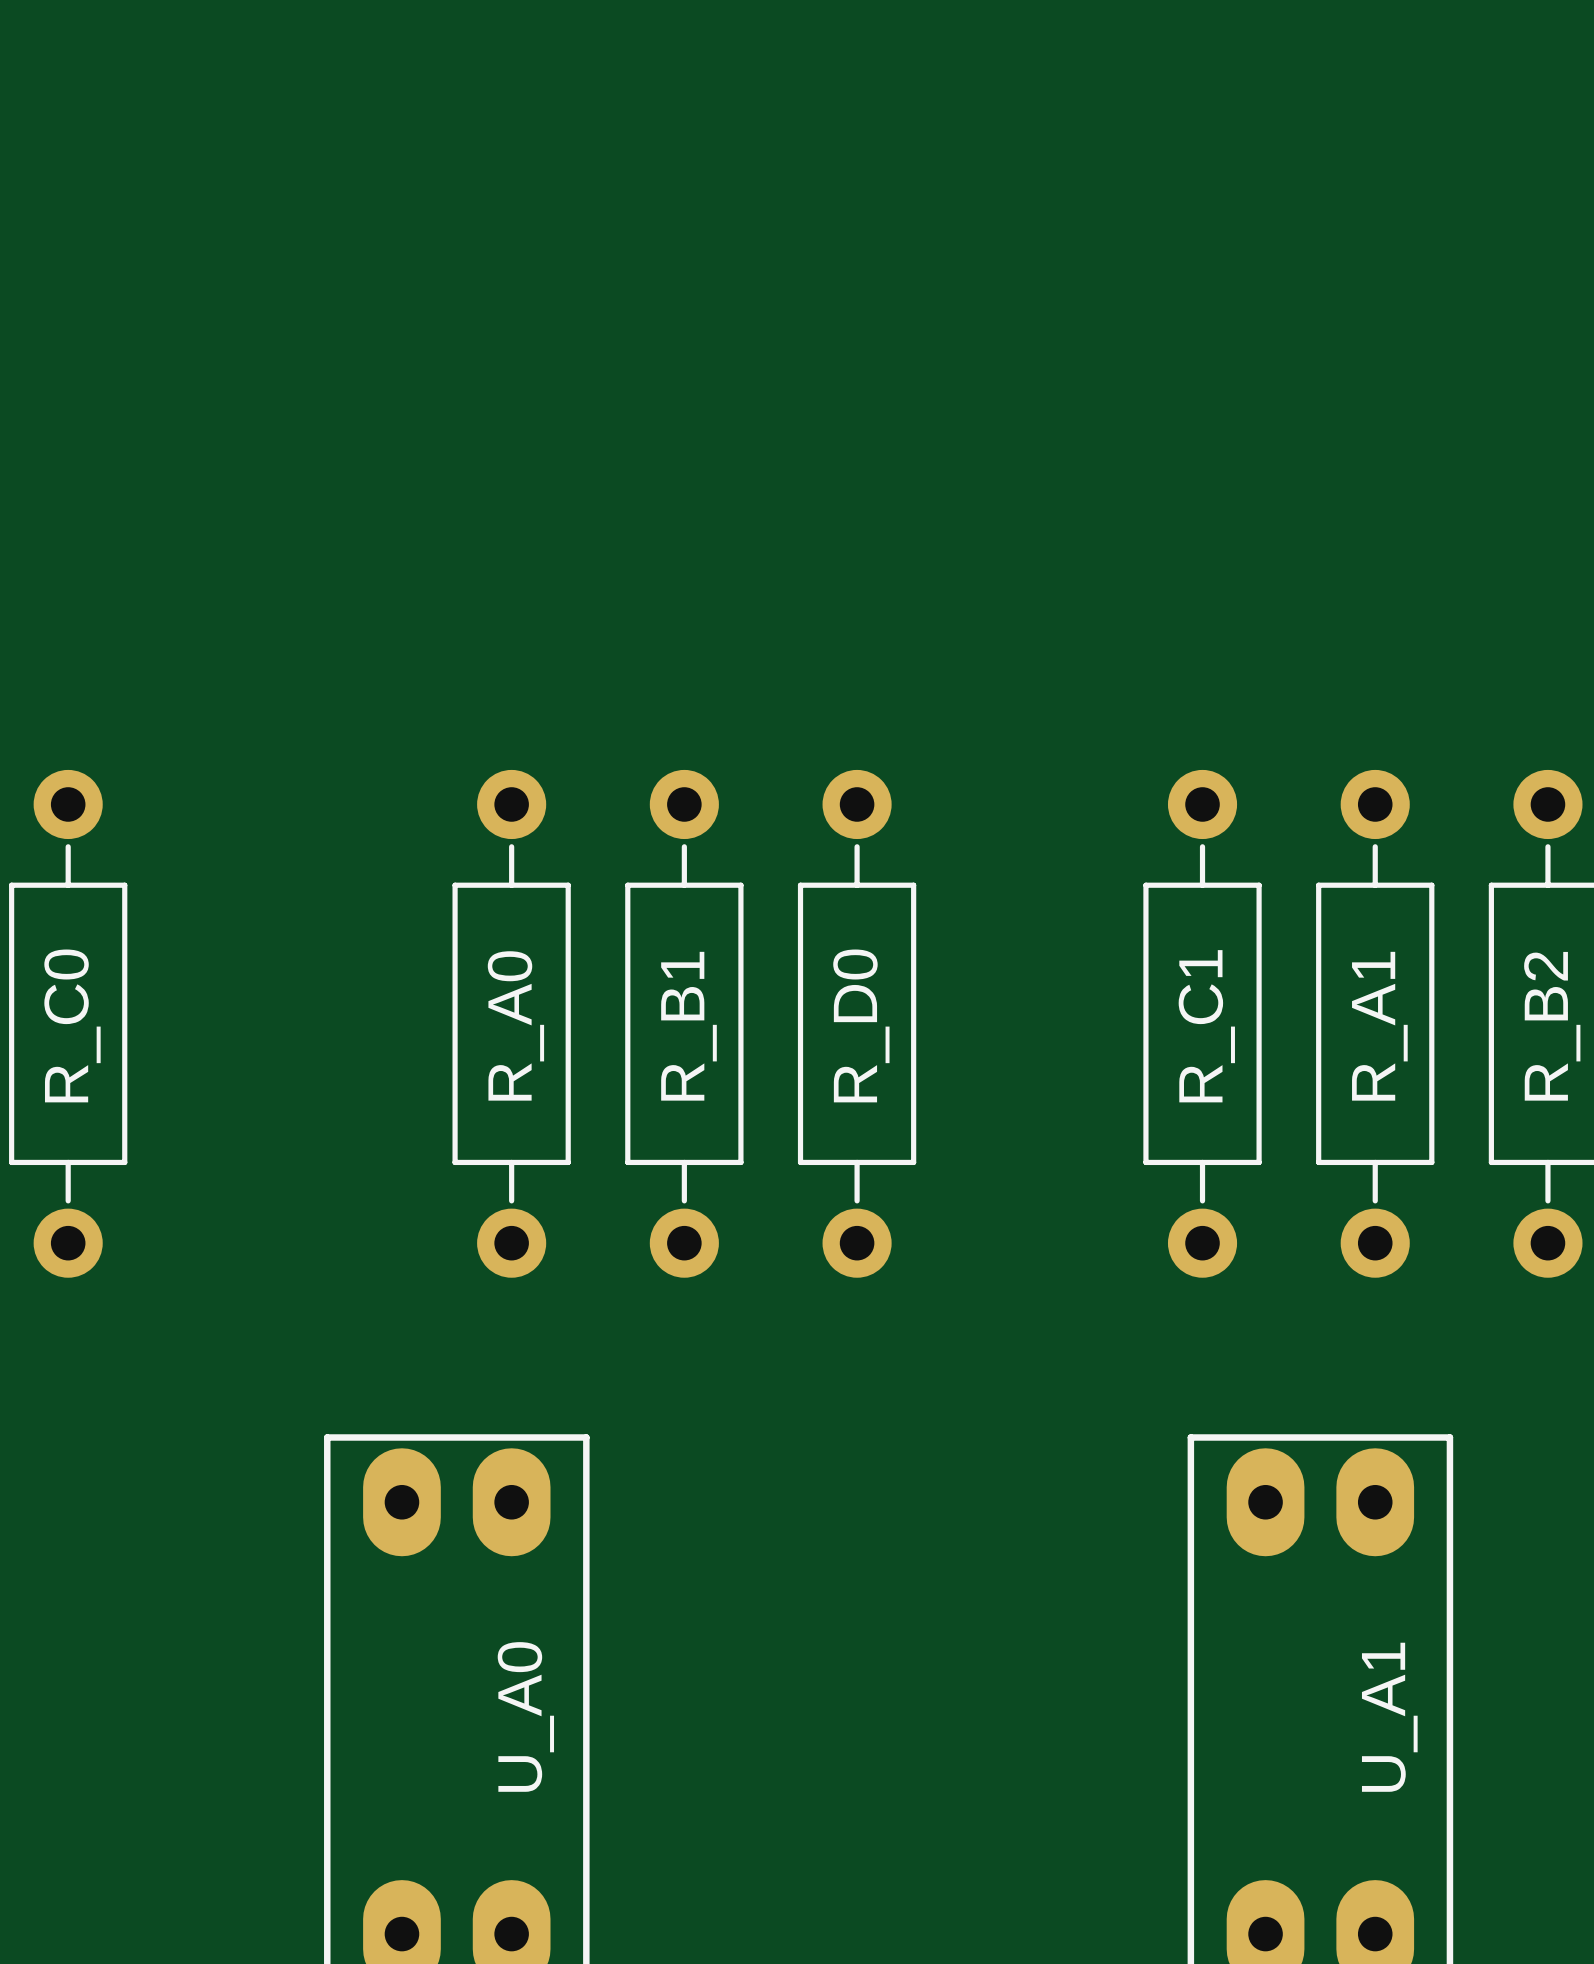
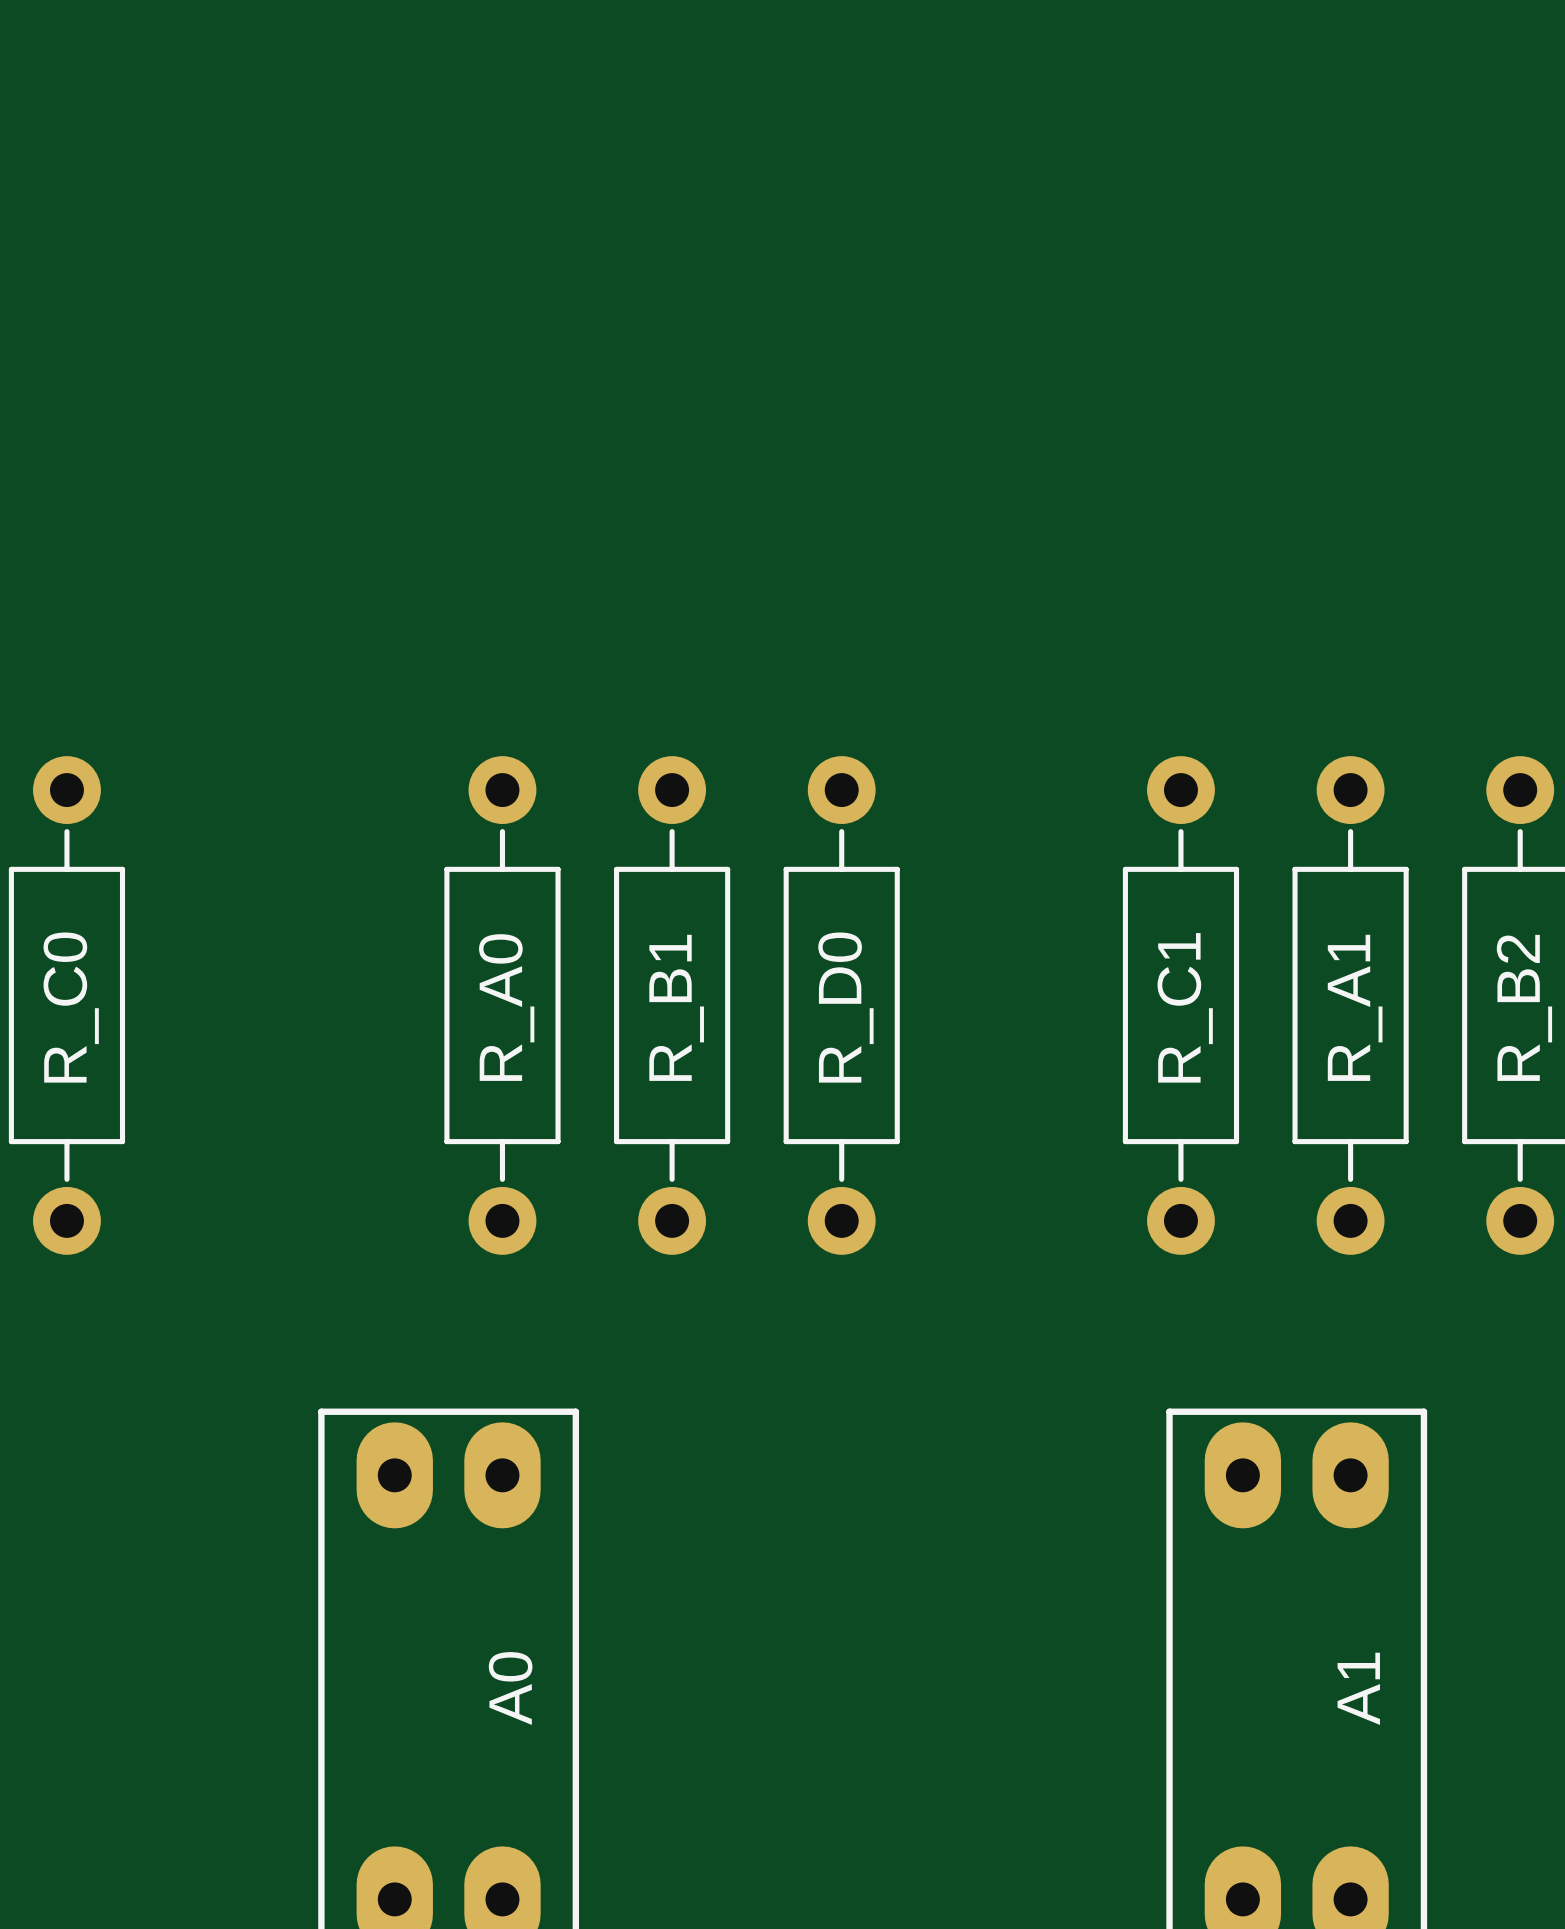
U_A0 name: U_A0 (525, 1716) -> A0 (510, 1688)
U_A1 name: U_A1 (1389, 1717) -> A1 (1358, 1688)

